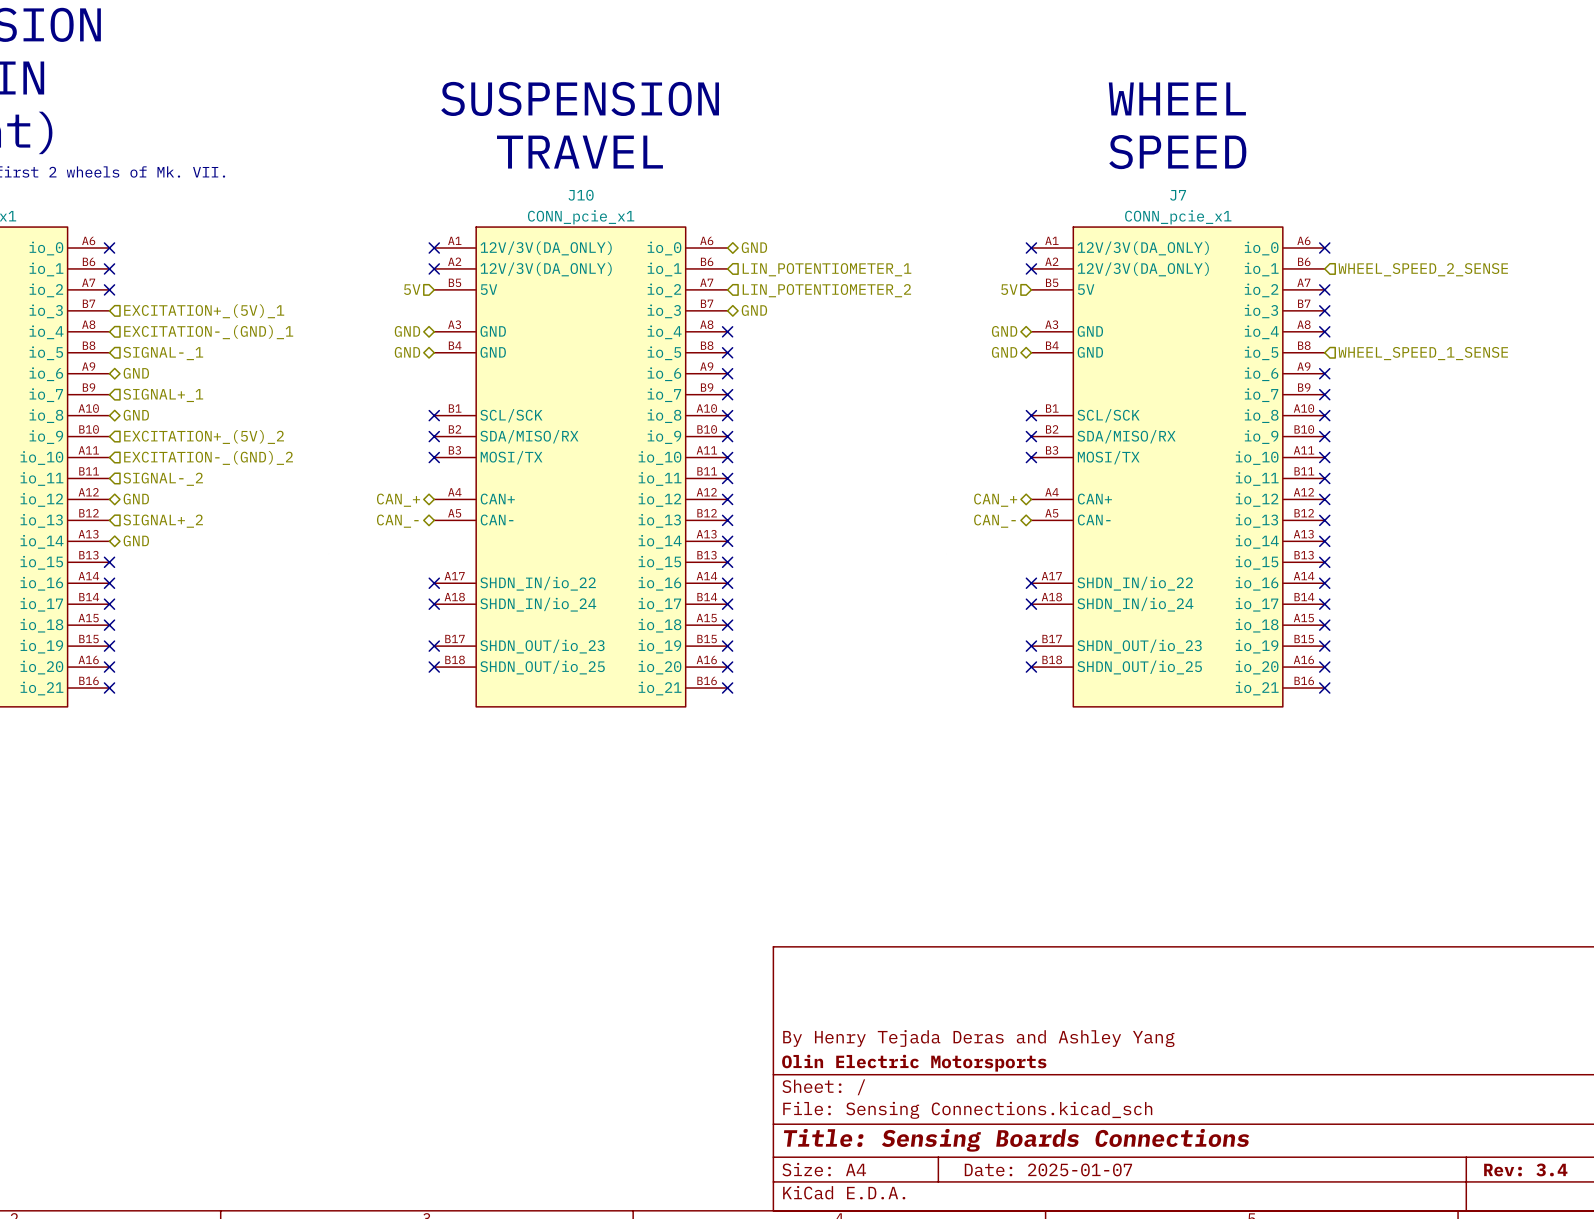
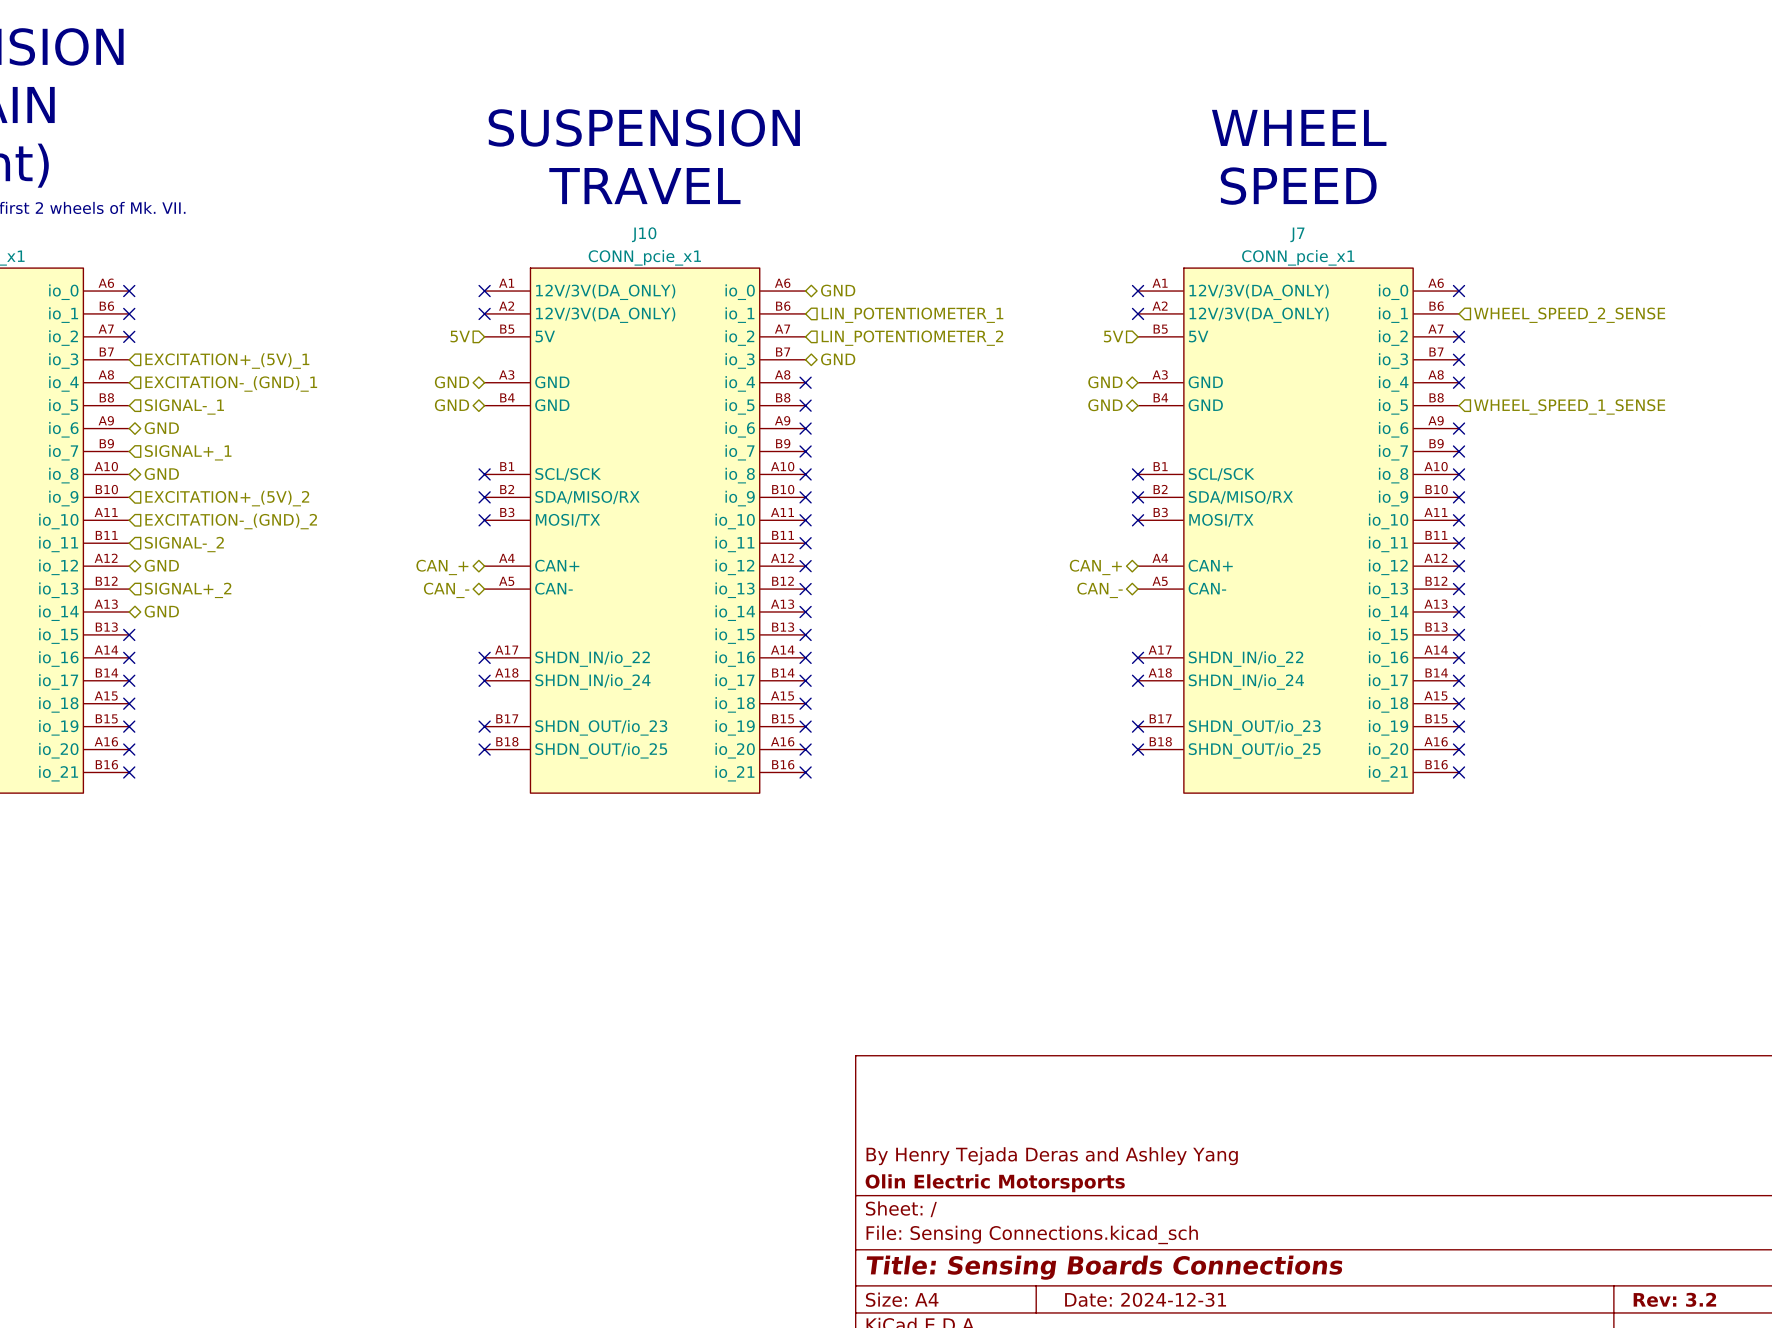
title block: Date: 2025-01-07 (1048, 1169) -> Date: 2024-12-31 (1145, 1299)
title block: Rev: 3.4 (1525, 1169) -> Rev: 3.2 (1674, 1299)

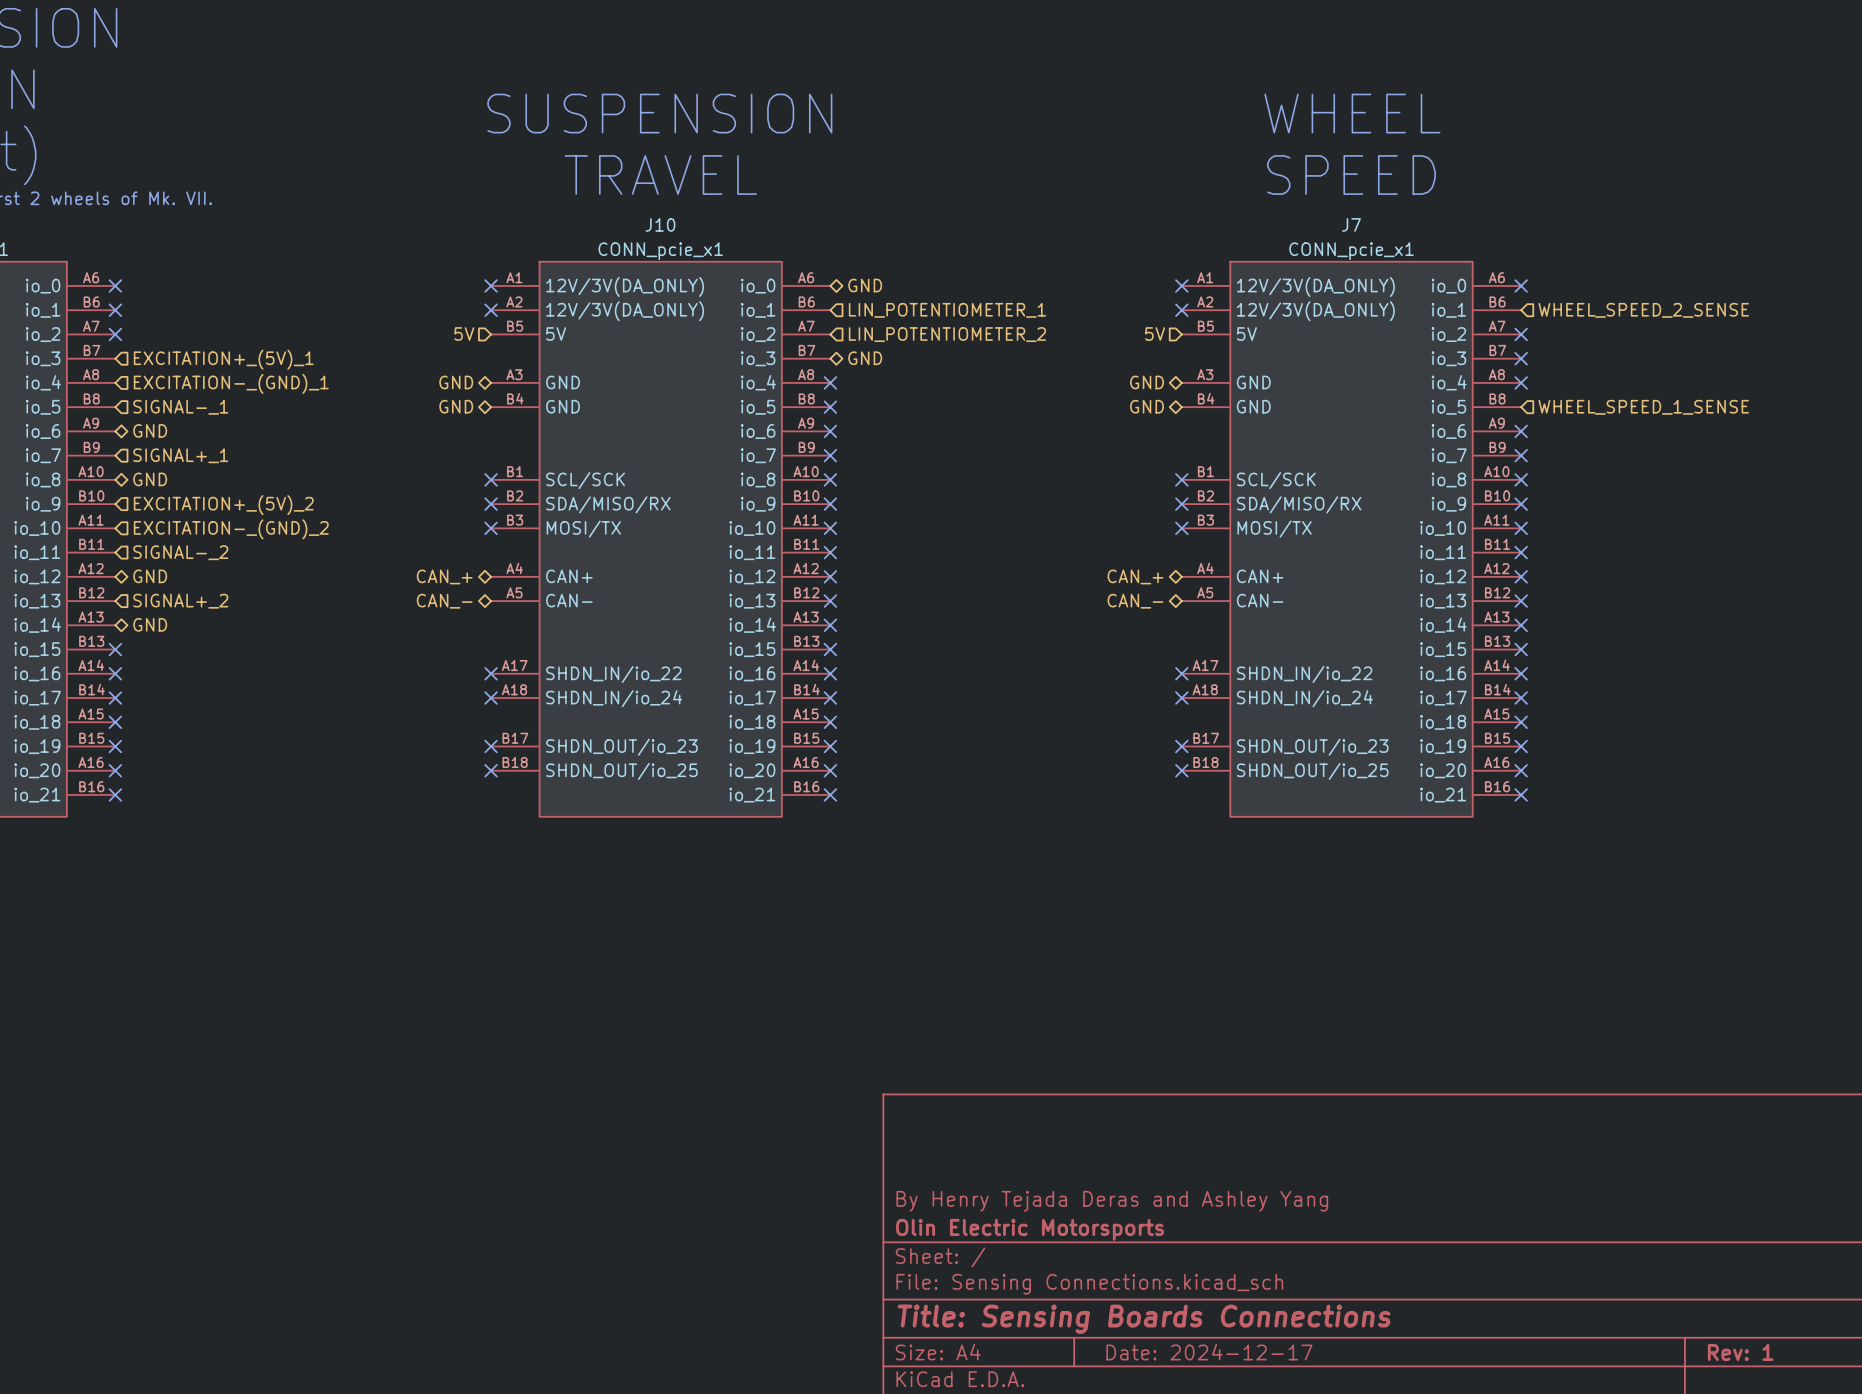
title block: Date: 2024-12-31 (1145, 1299) -> Date: 2024-12-17 (1209, 1352)
title block: Rev: 3.2 (1674, 1299) -> Rev: 1 (1740, 1352)

